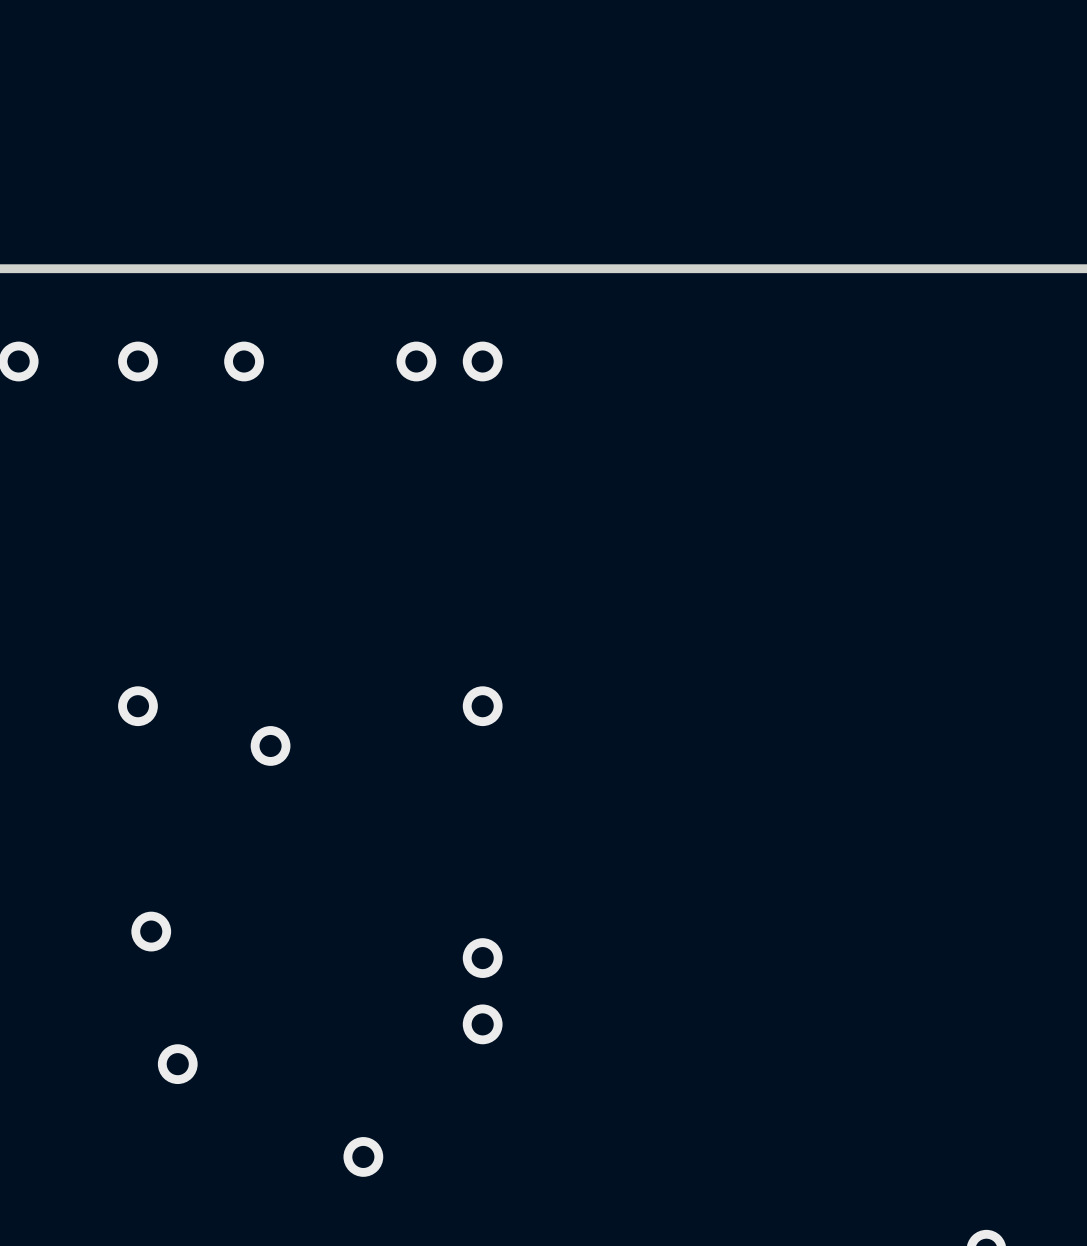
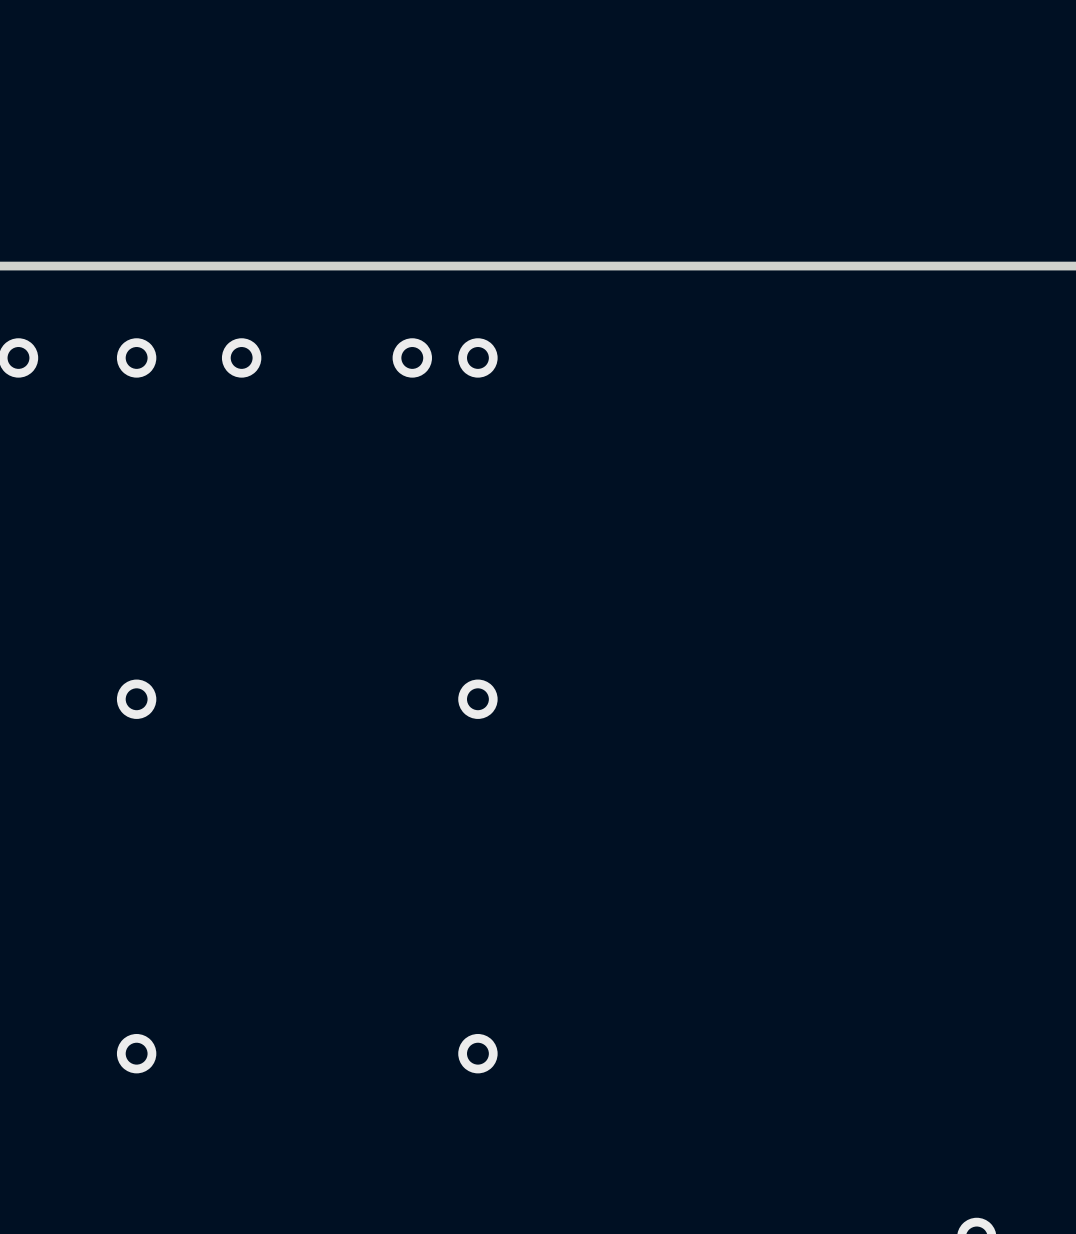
via: (270, 745) -> none
via: (151, 931) -> none
via: (482, 958) -> none
via position: (482, 1024) -> (477, 1053)
via position: (177, 1064) -> (136, 1053)
via: (363, 1156) -> none

